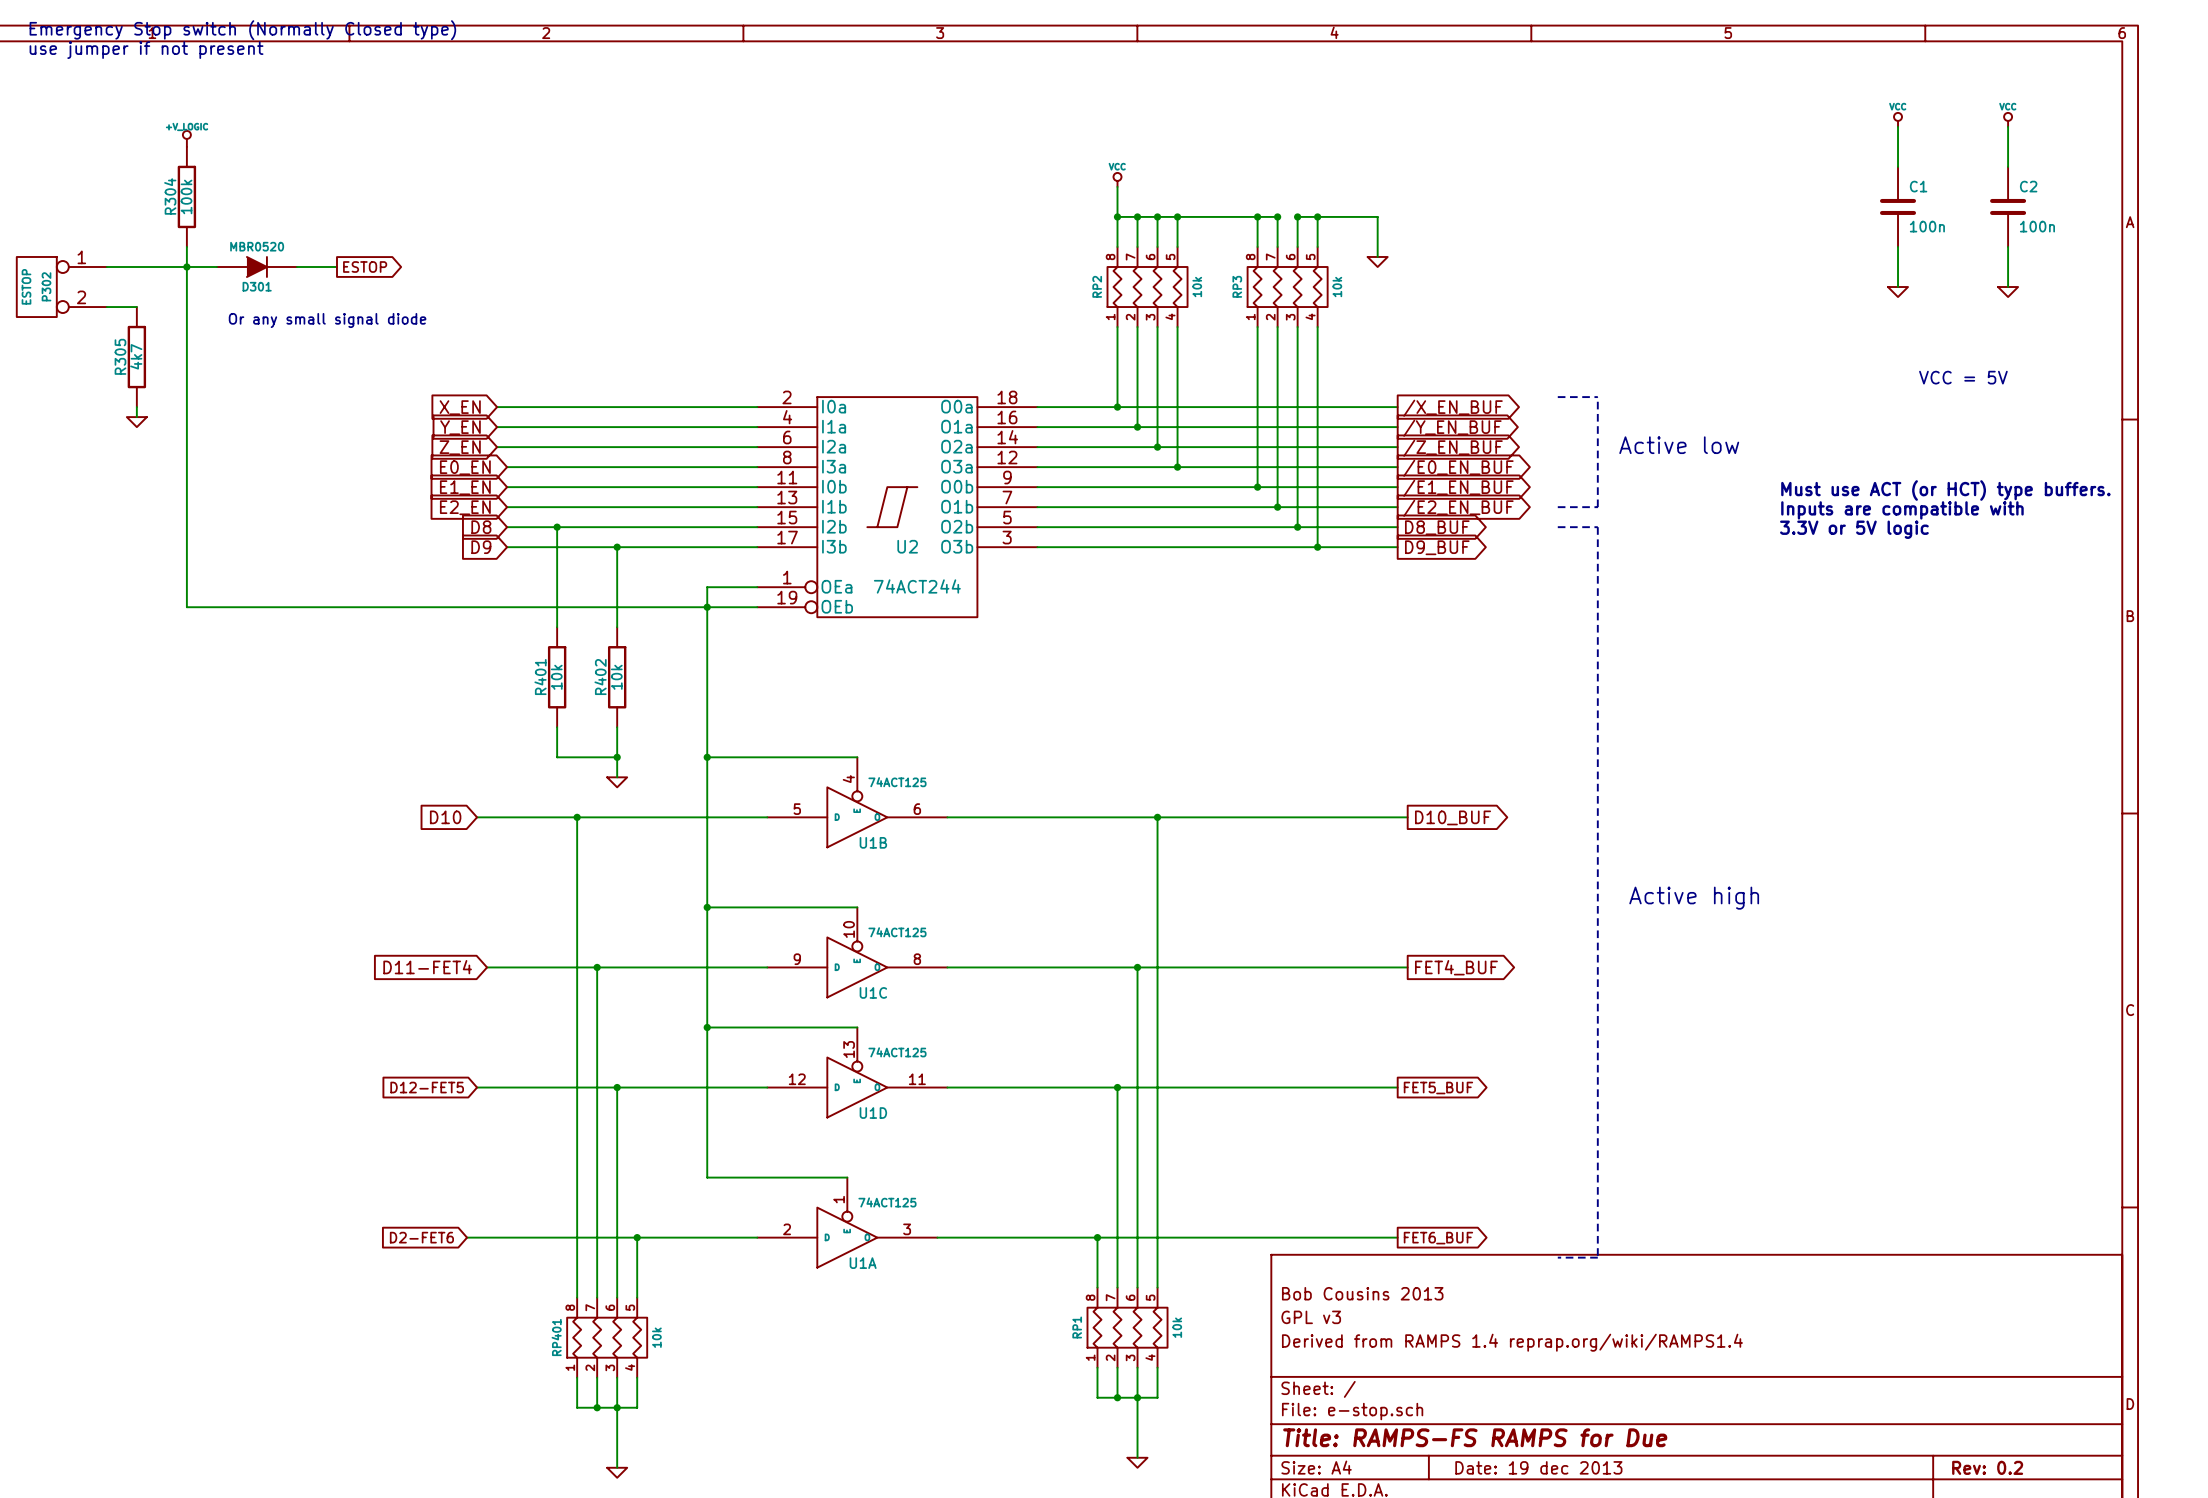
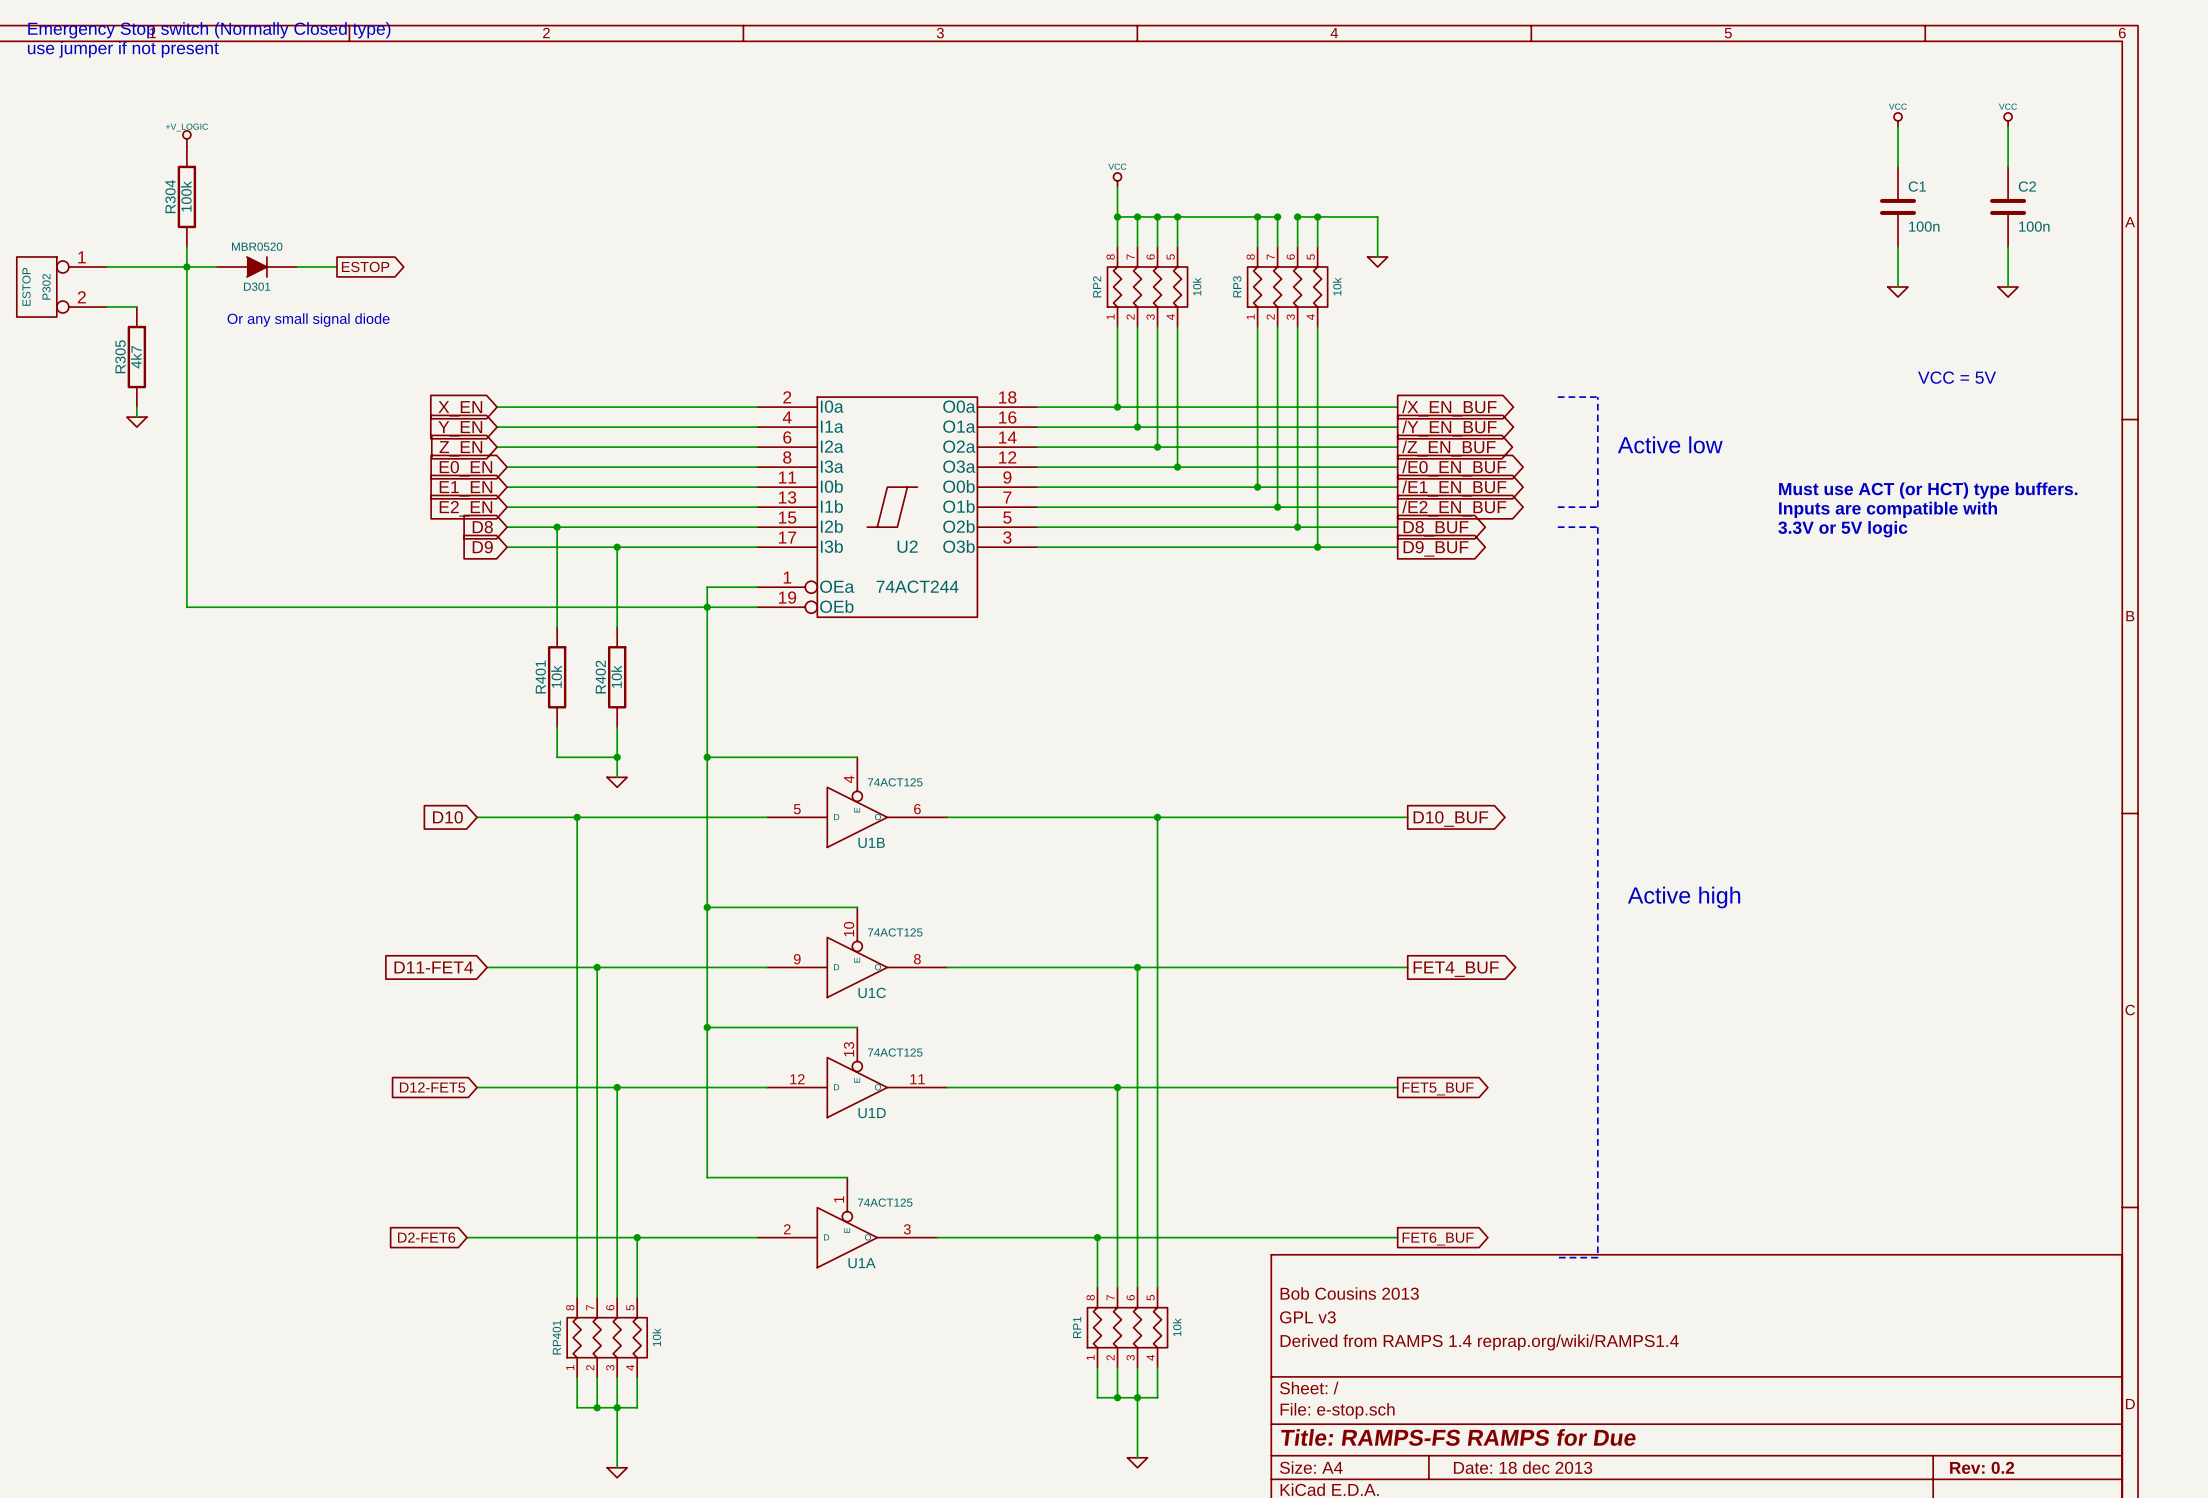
title block: Date: 19 dec 2013 (1538, 1467) -> Date: 18 dec 2013 (1523, 1467)

